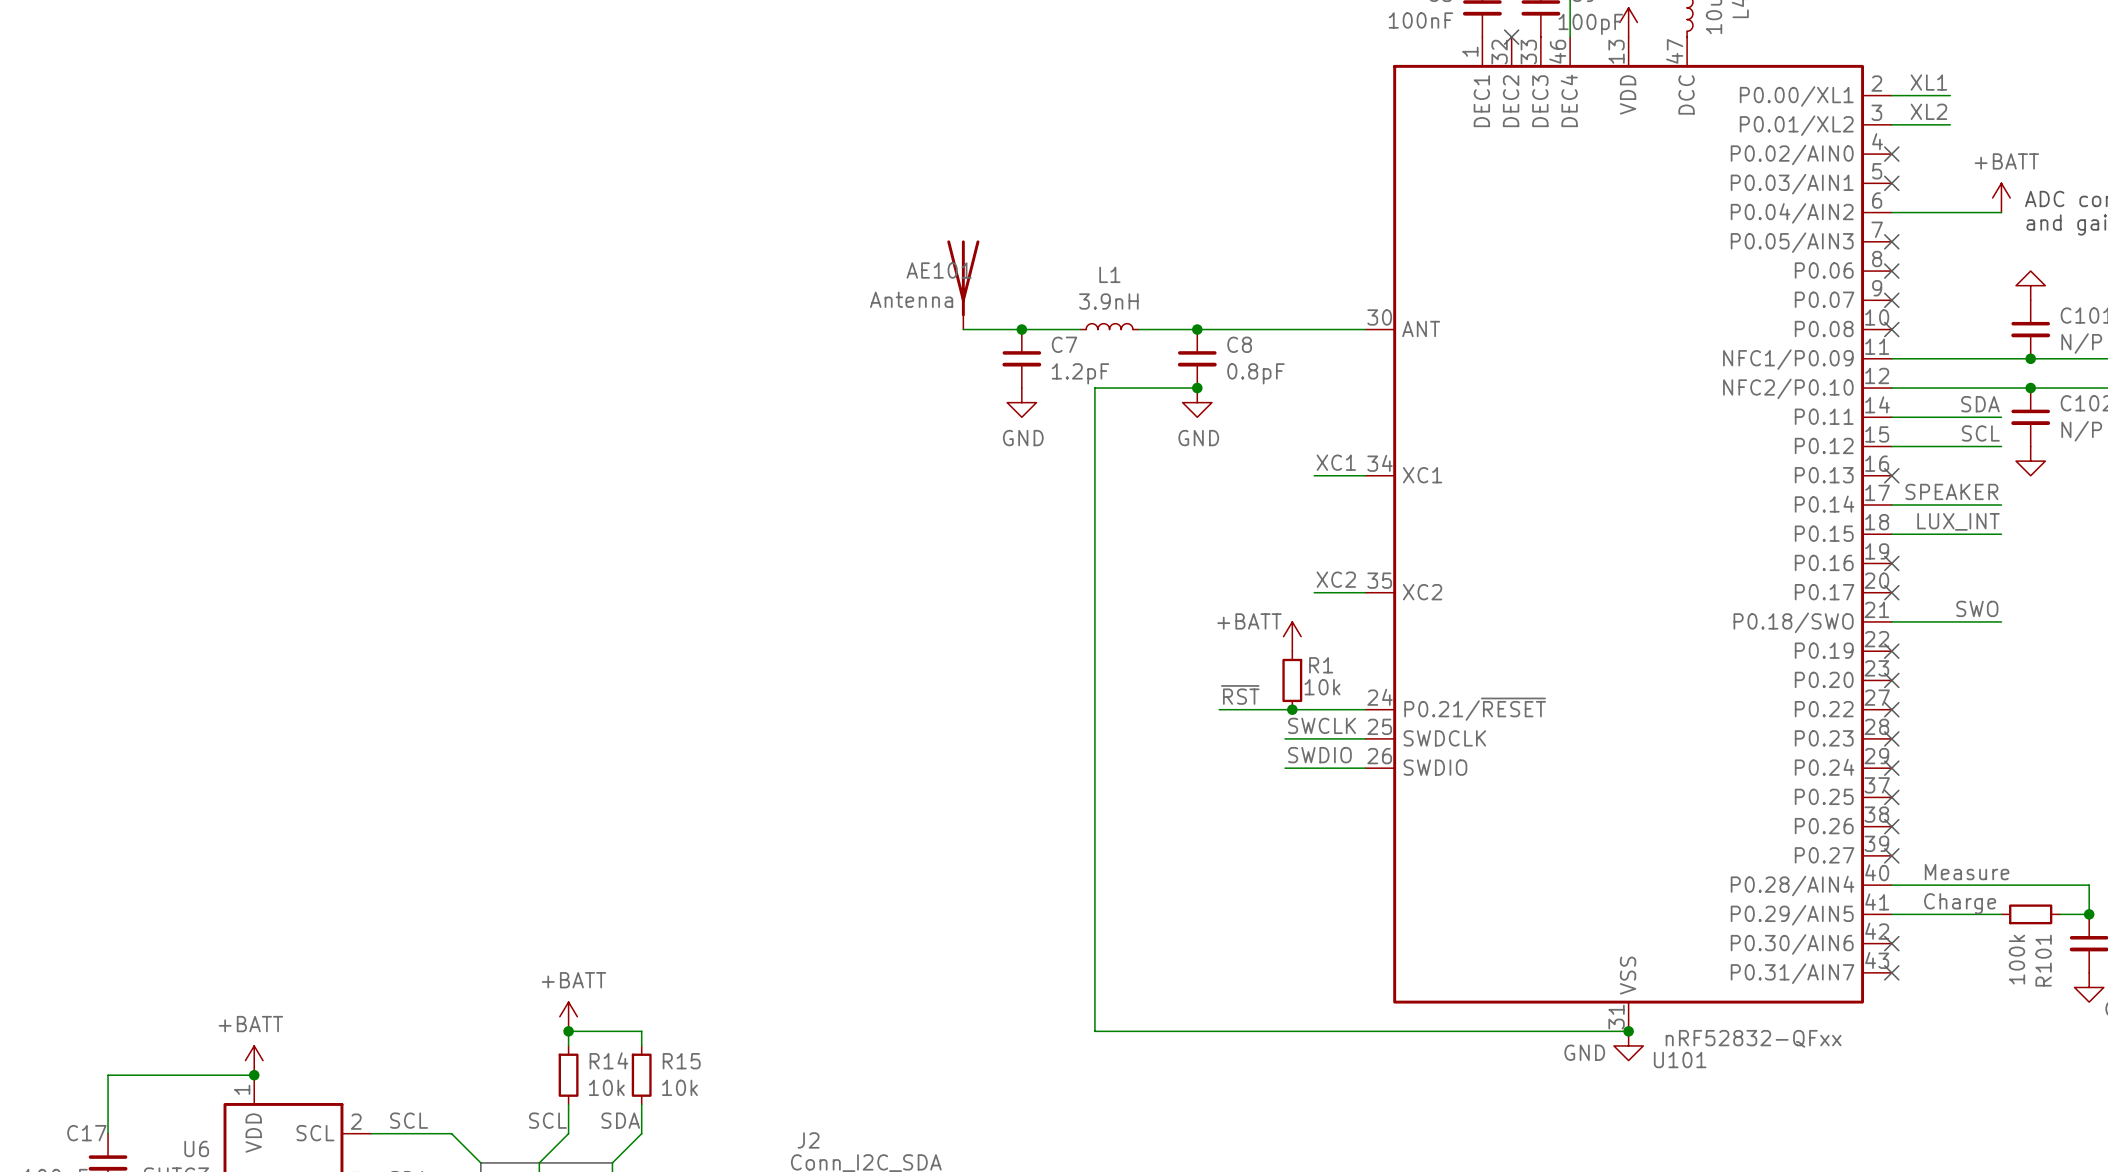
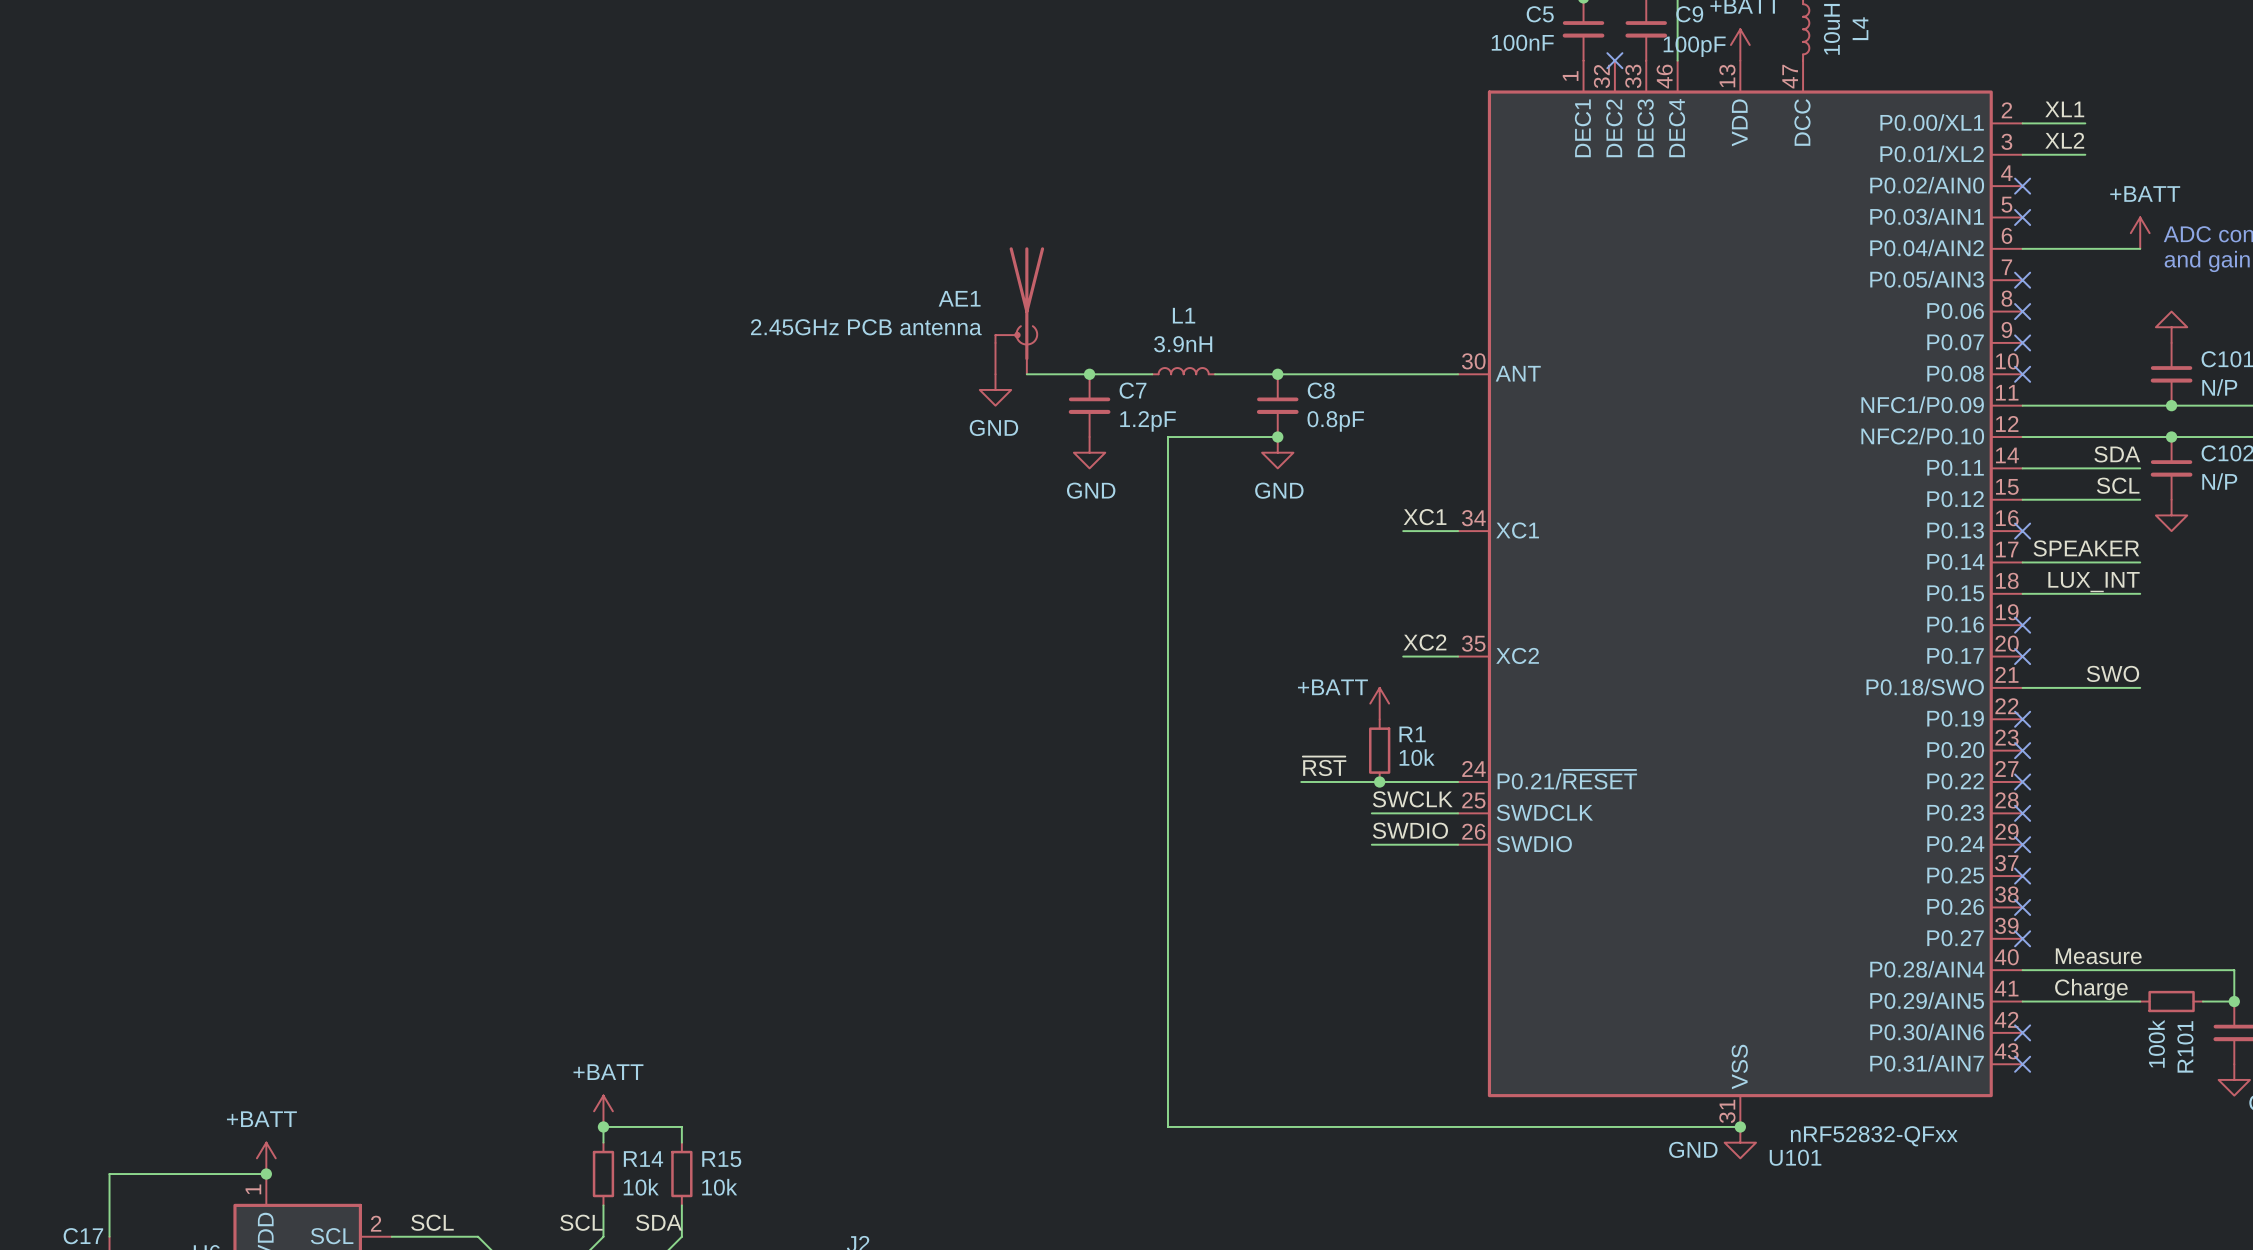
AE1: none -> 2.45GHz PCB antenna (1019, 310)
AE101: Antenna (963, 284) -> none
power symbol: none -> GND (995, 389)

